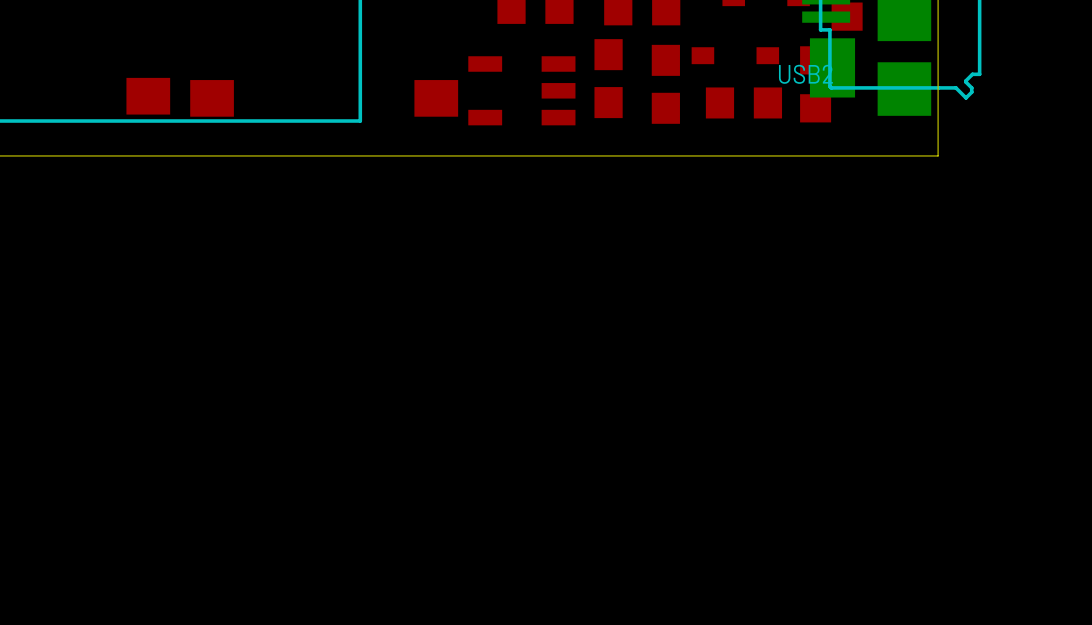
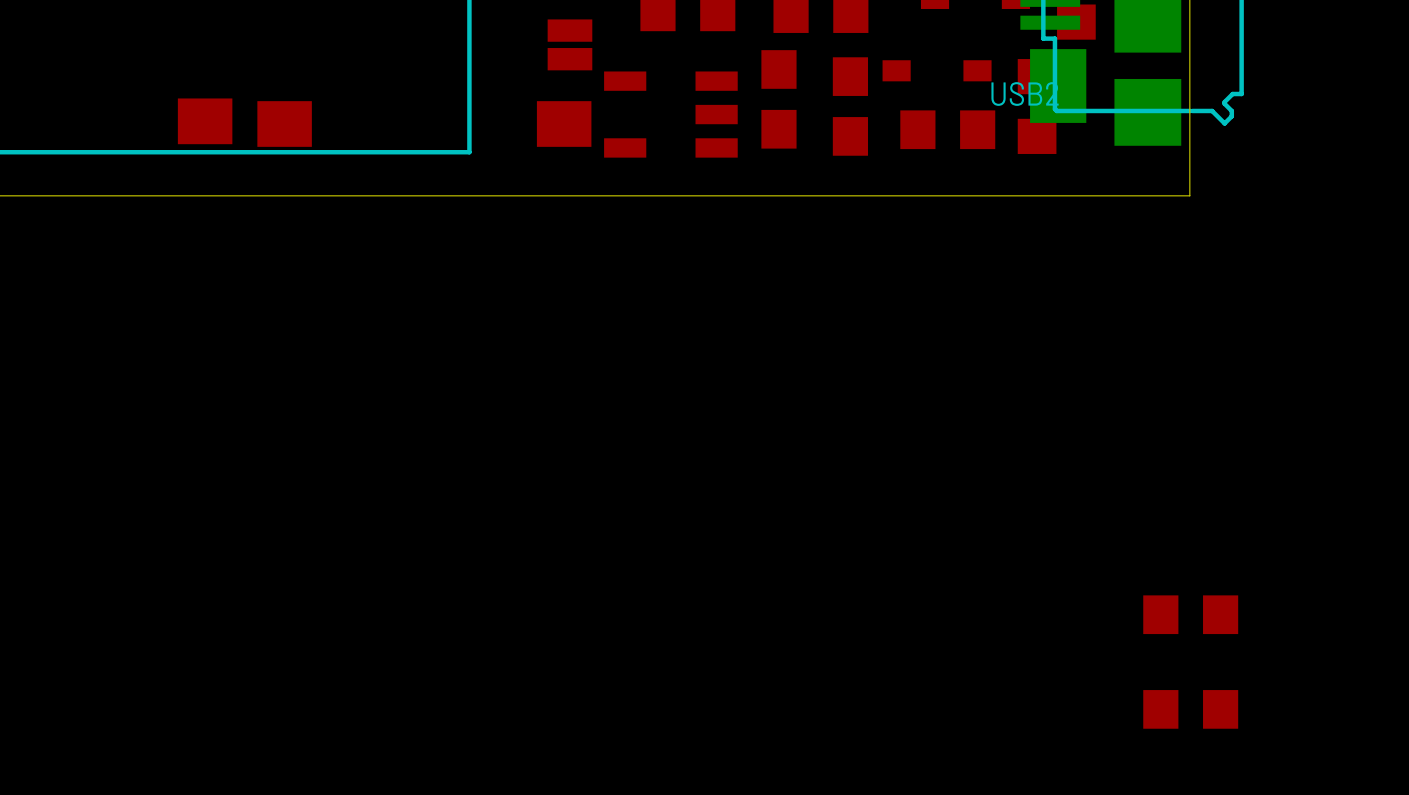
part: none -> (569, 44)
part: none -> (1190, 614)
part: none -> (1190, 709)

